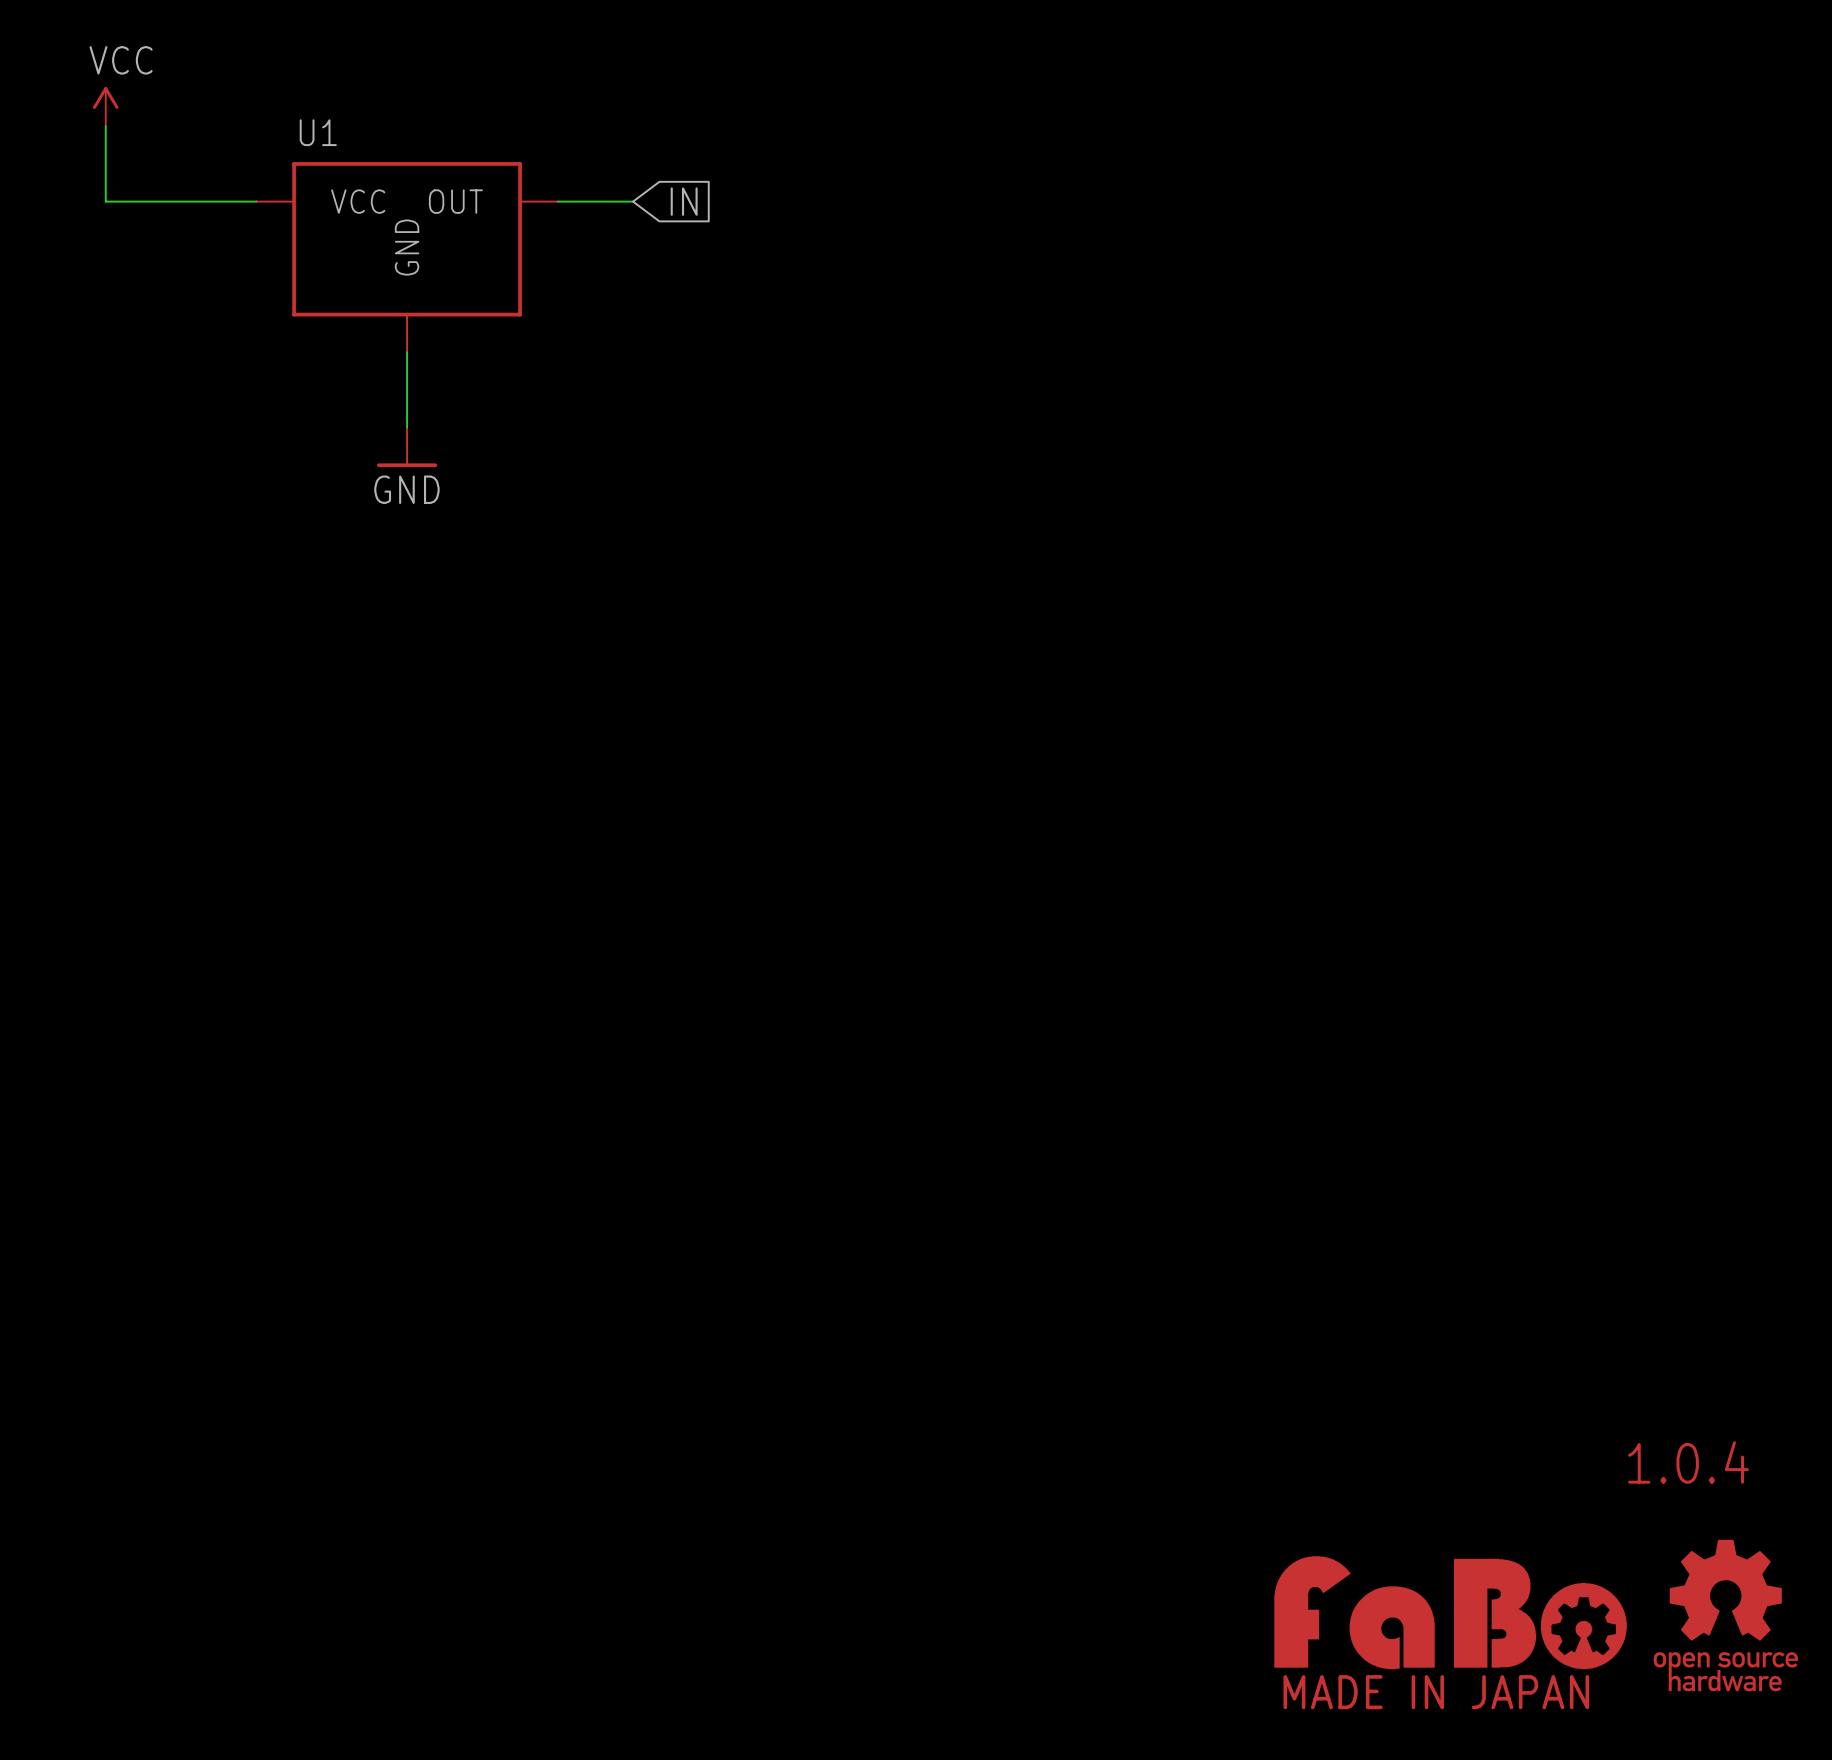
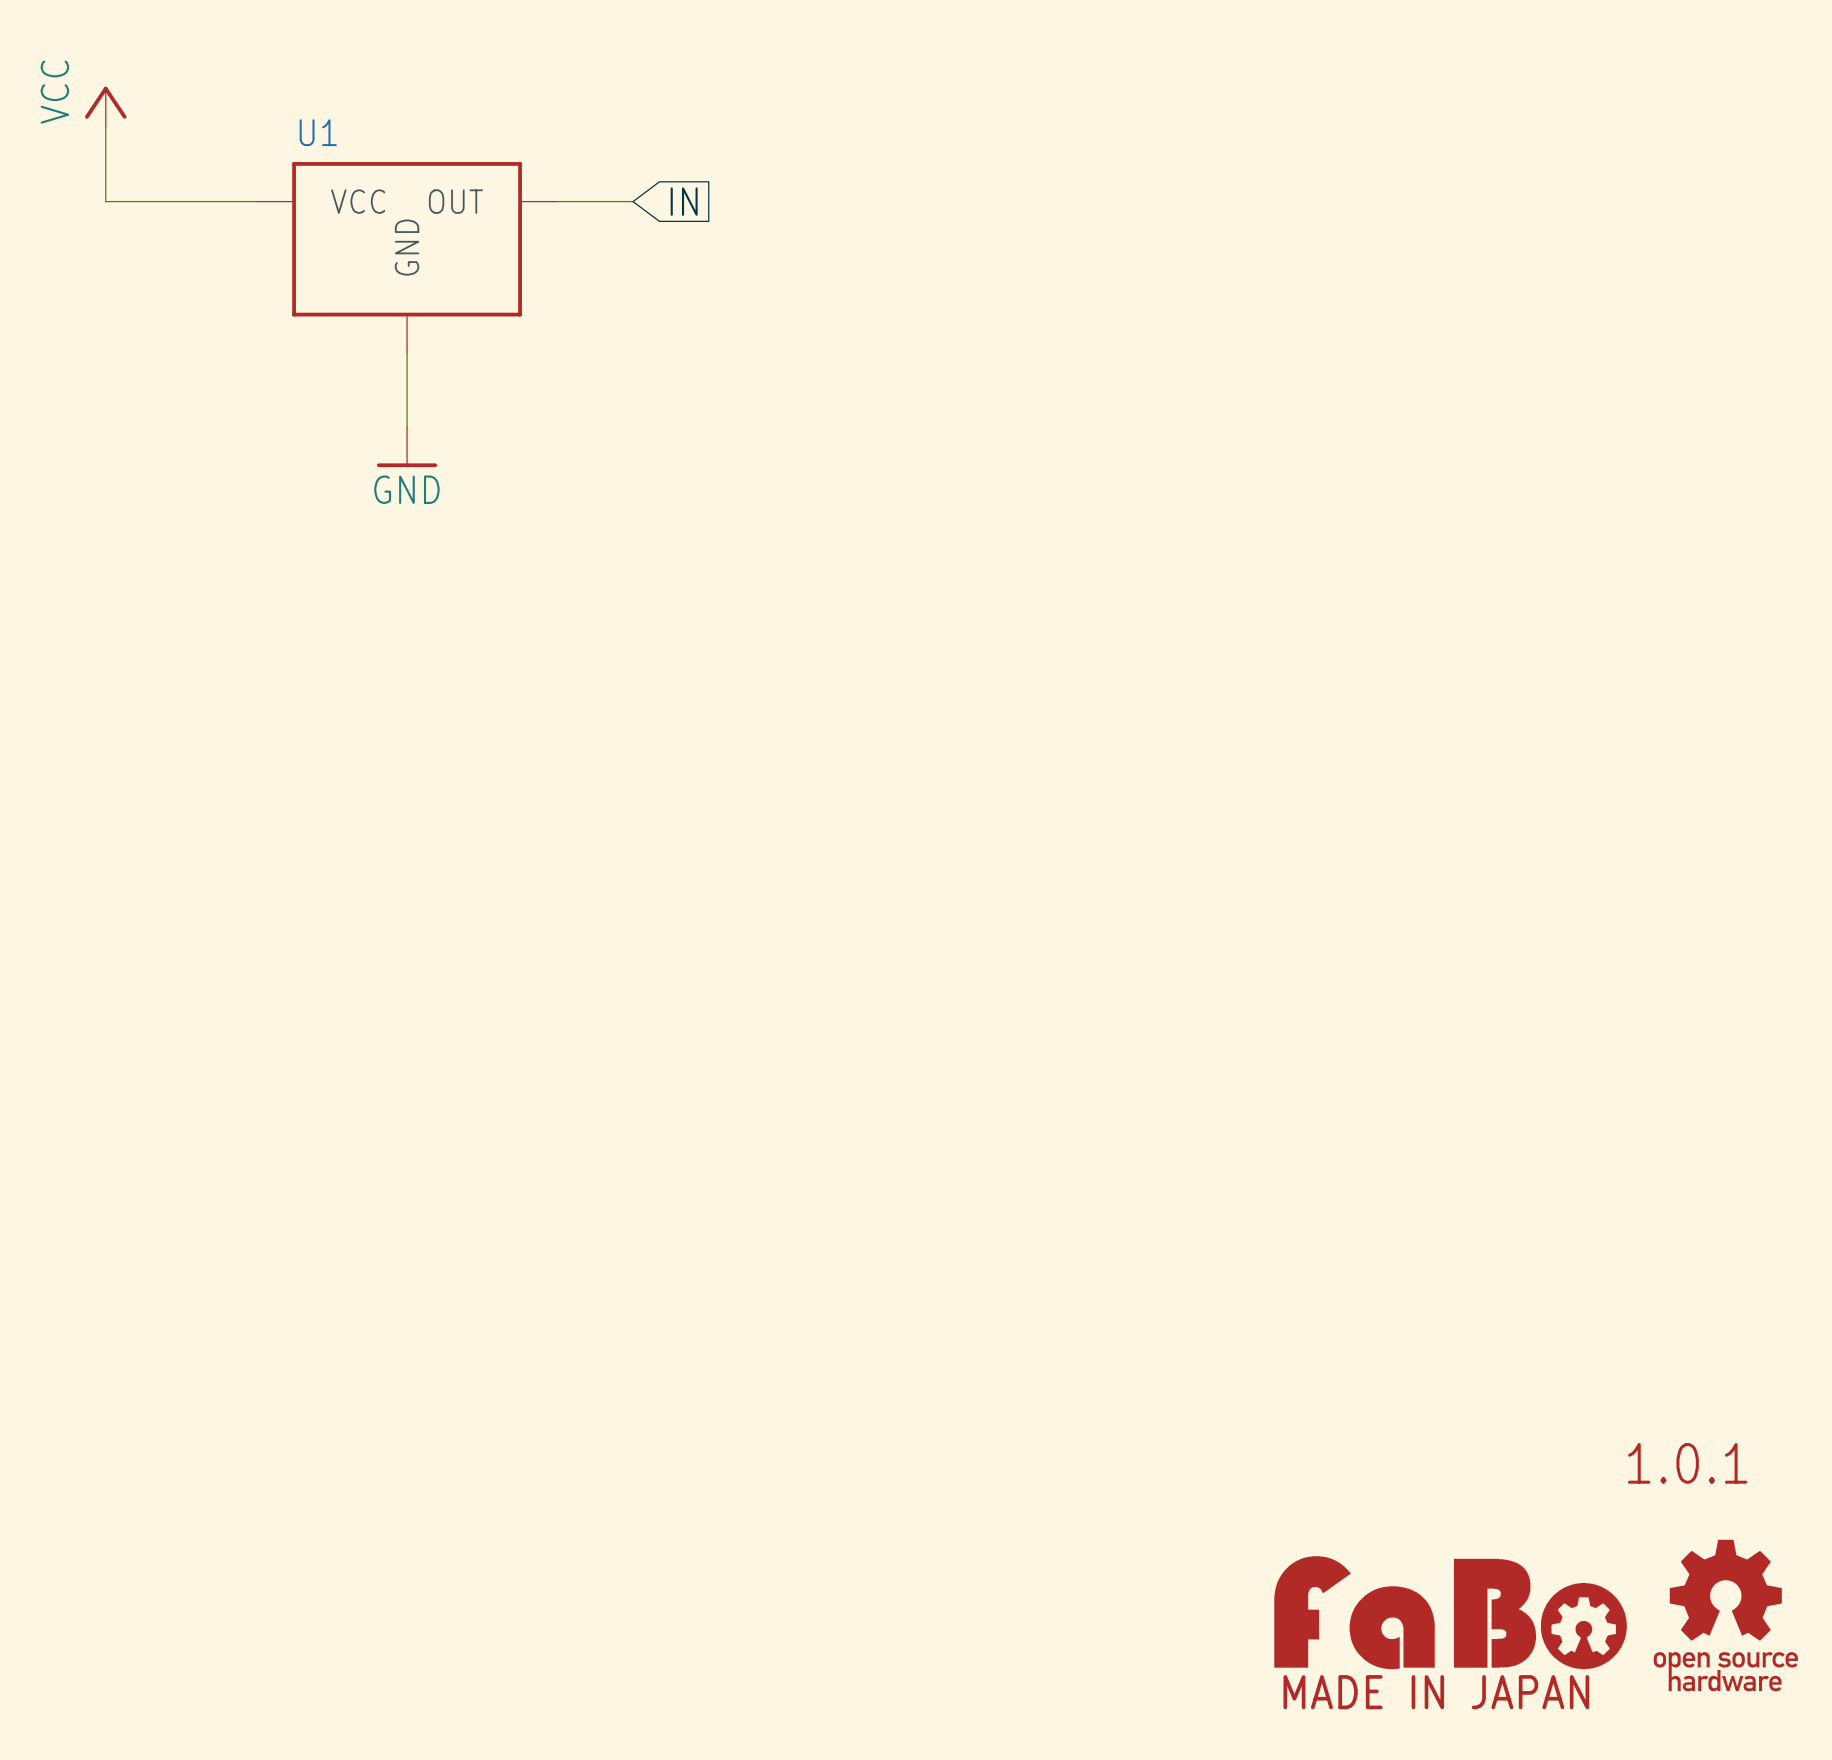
power symbol text rotation: 0° (121, 60) -> 90° counterclockwise (54, 92)
power symbol shape: [92, 87, 119, 127] -> [85, 86, 127, 127]
text: 1.0.4 (1688, 1462) -> 1.0.1 (1687, 1463)

